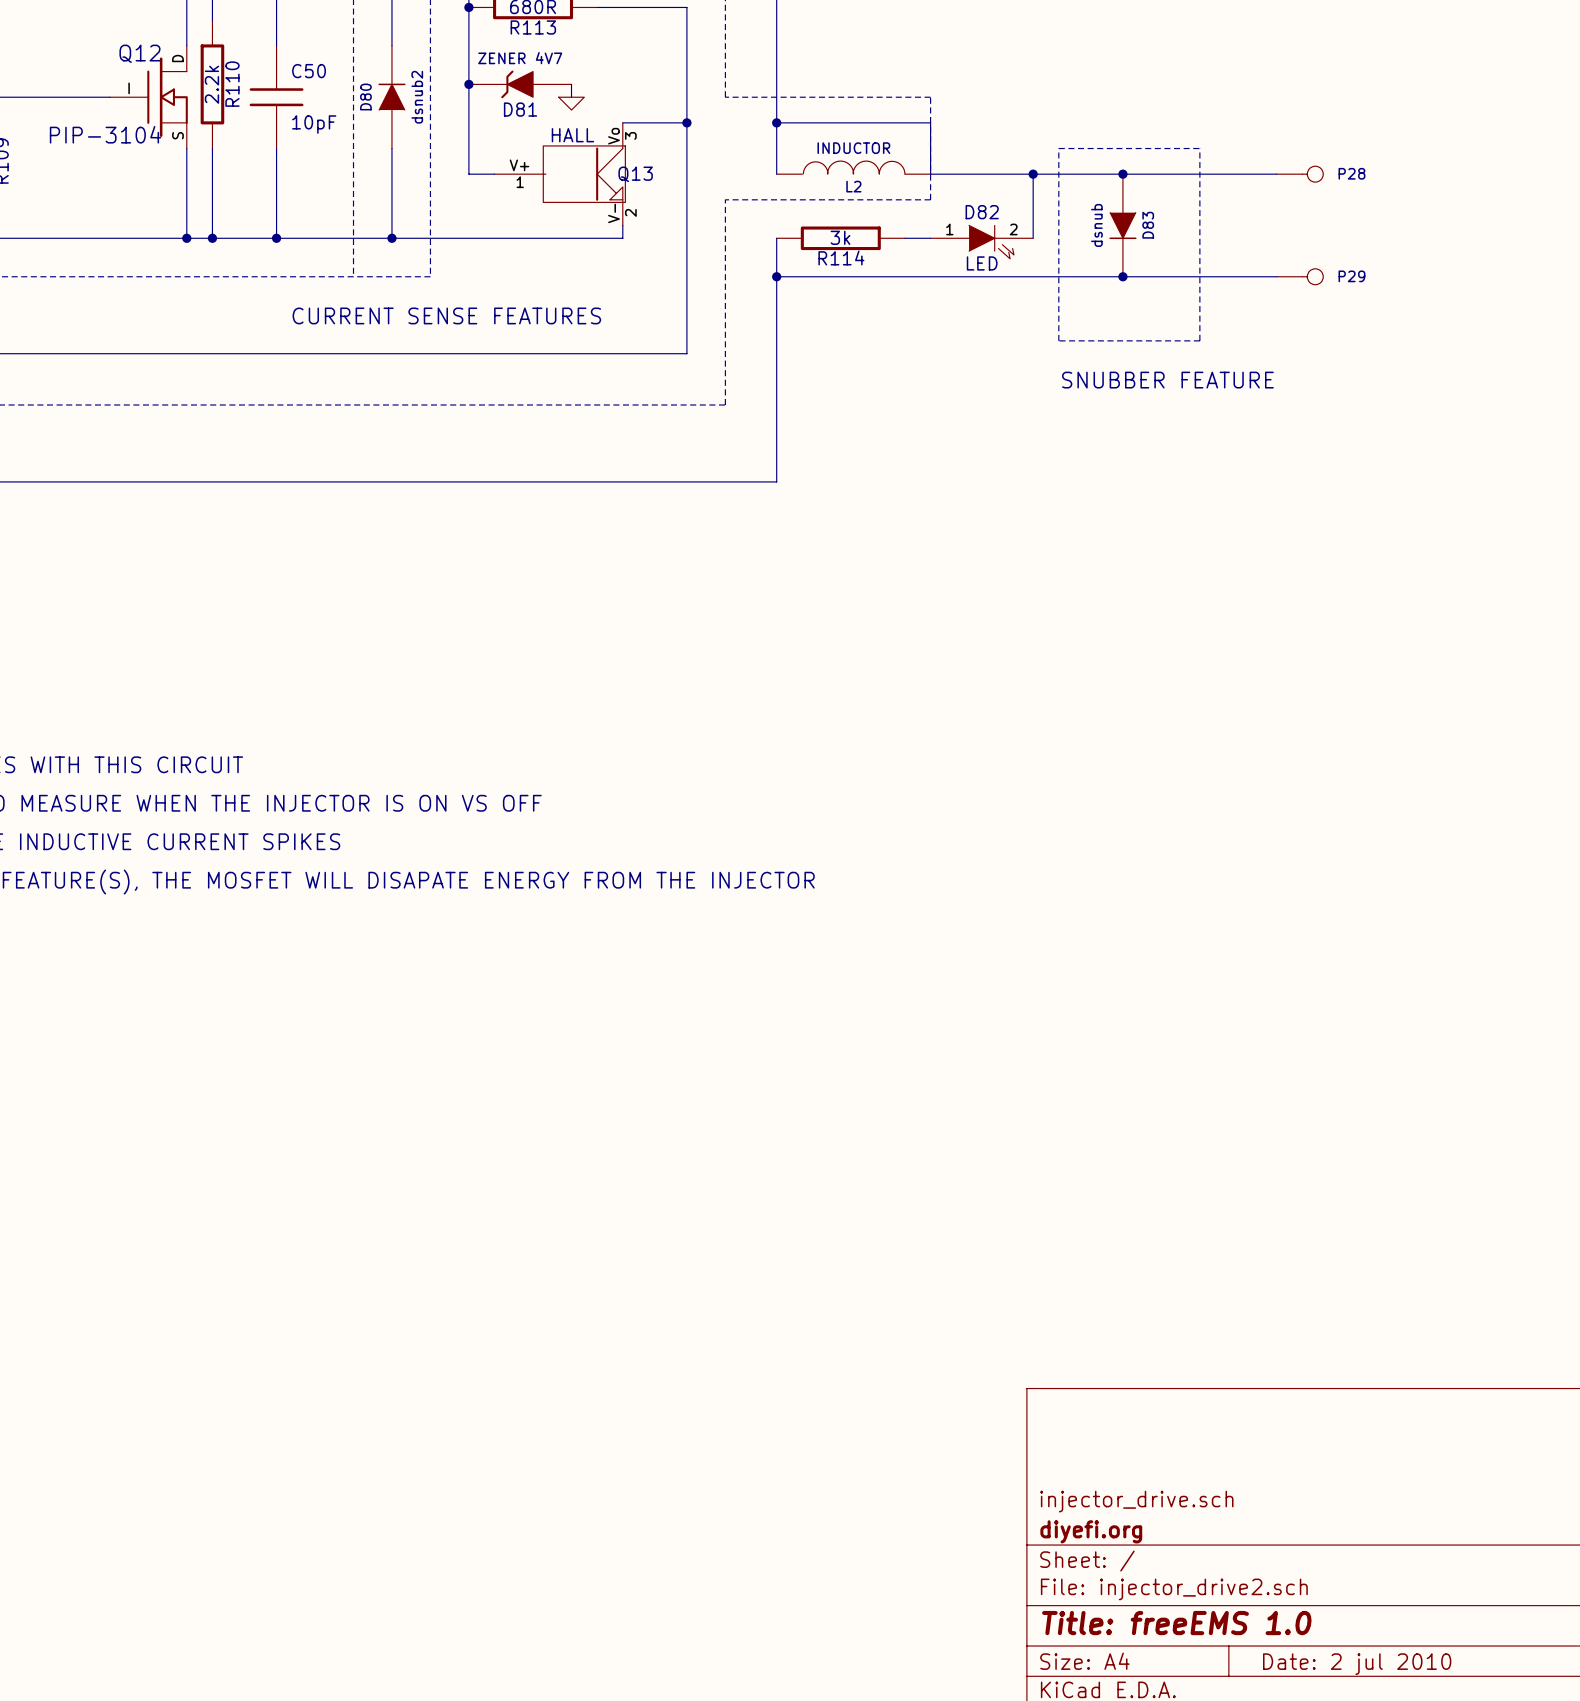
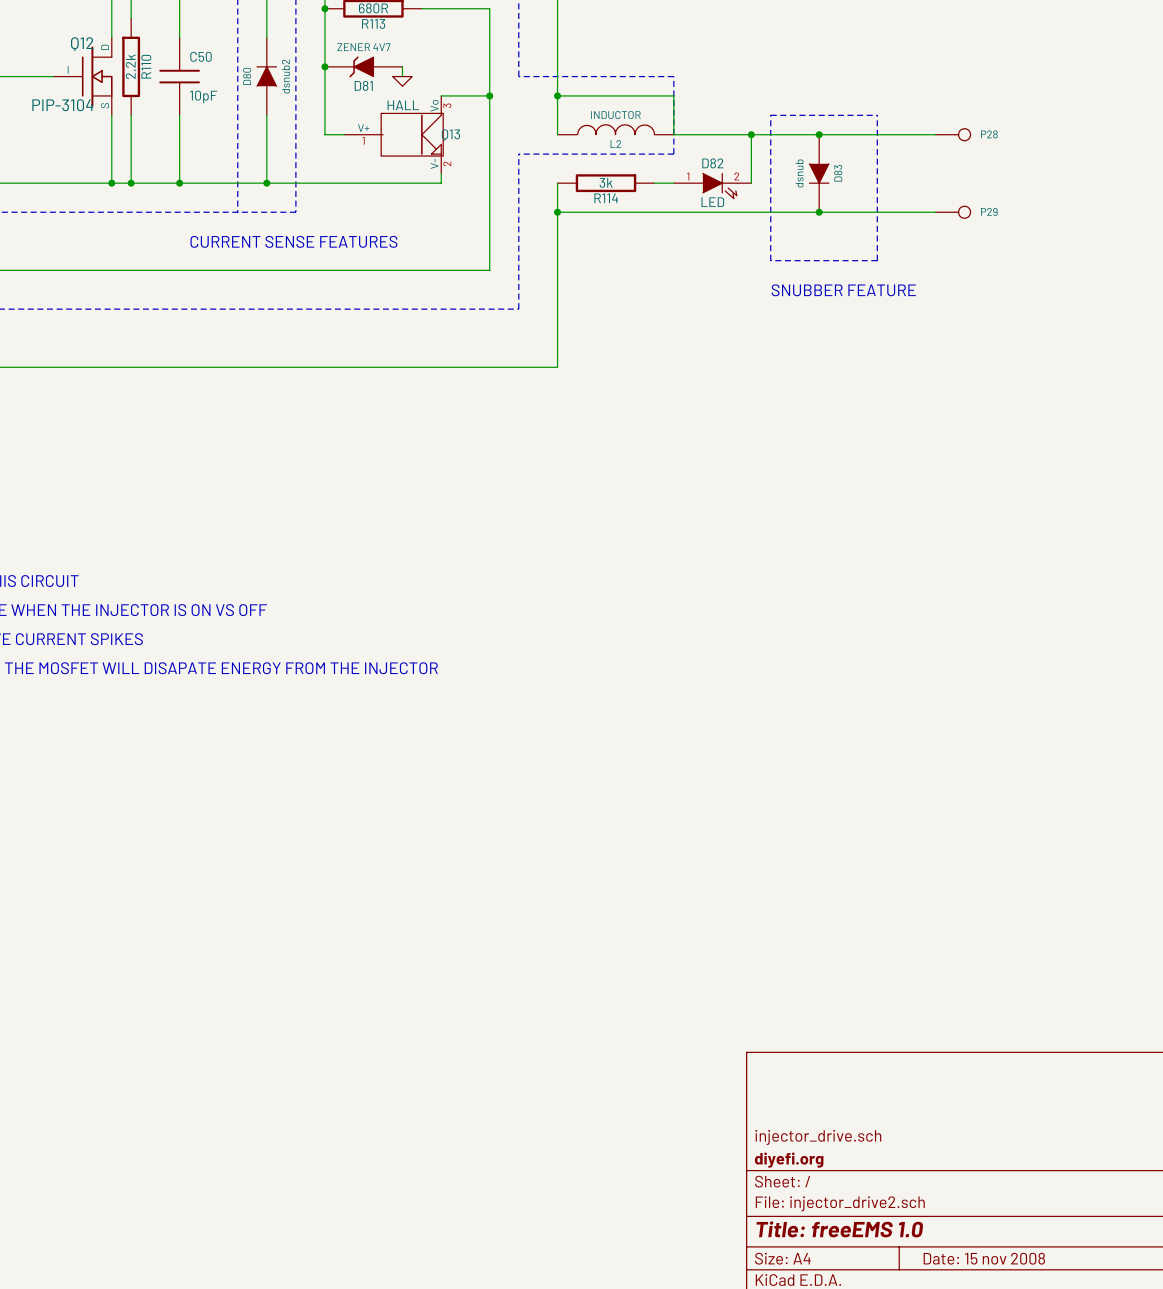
title block: Date: 2 jul 2010 (1357, 1664) -> Date: 15 nov 2008 (984, 1258)

